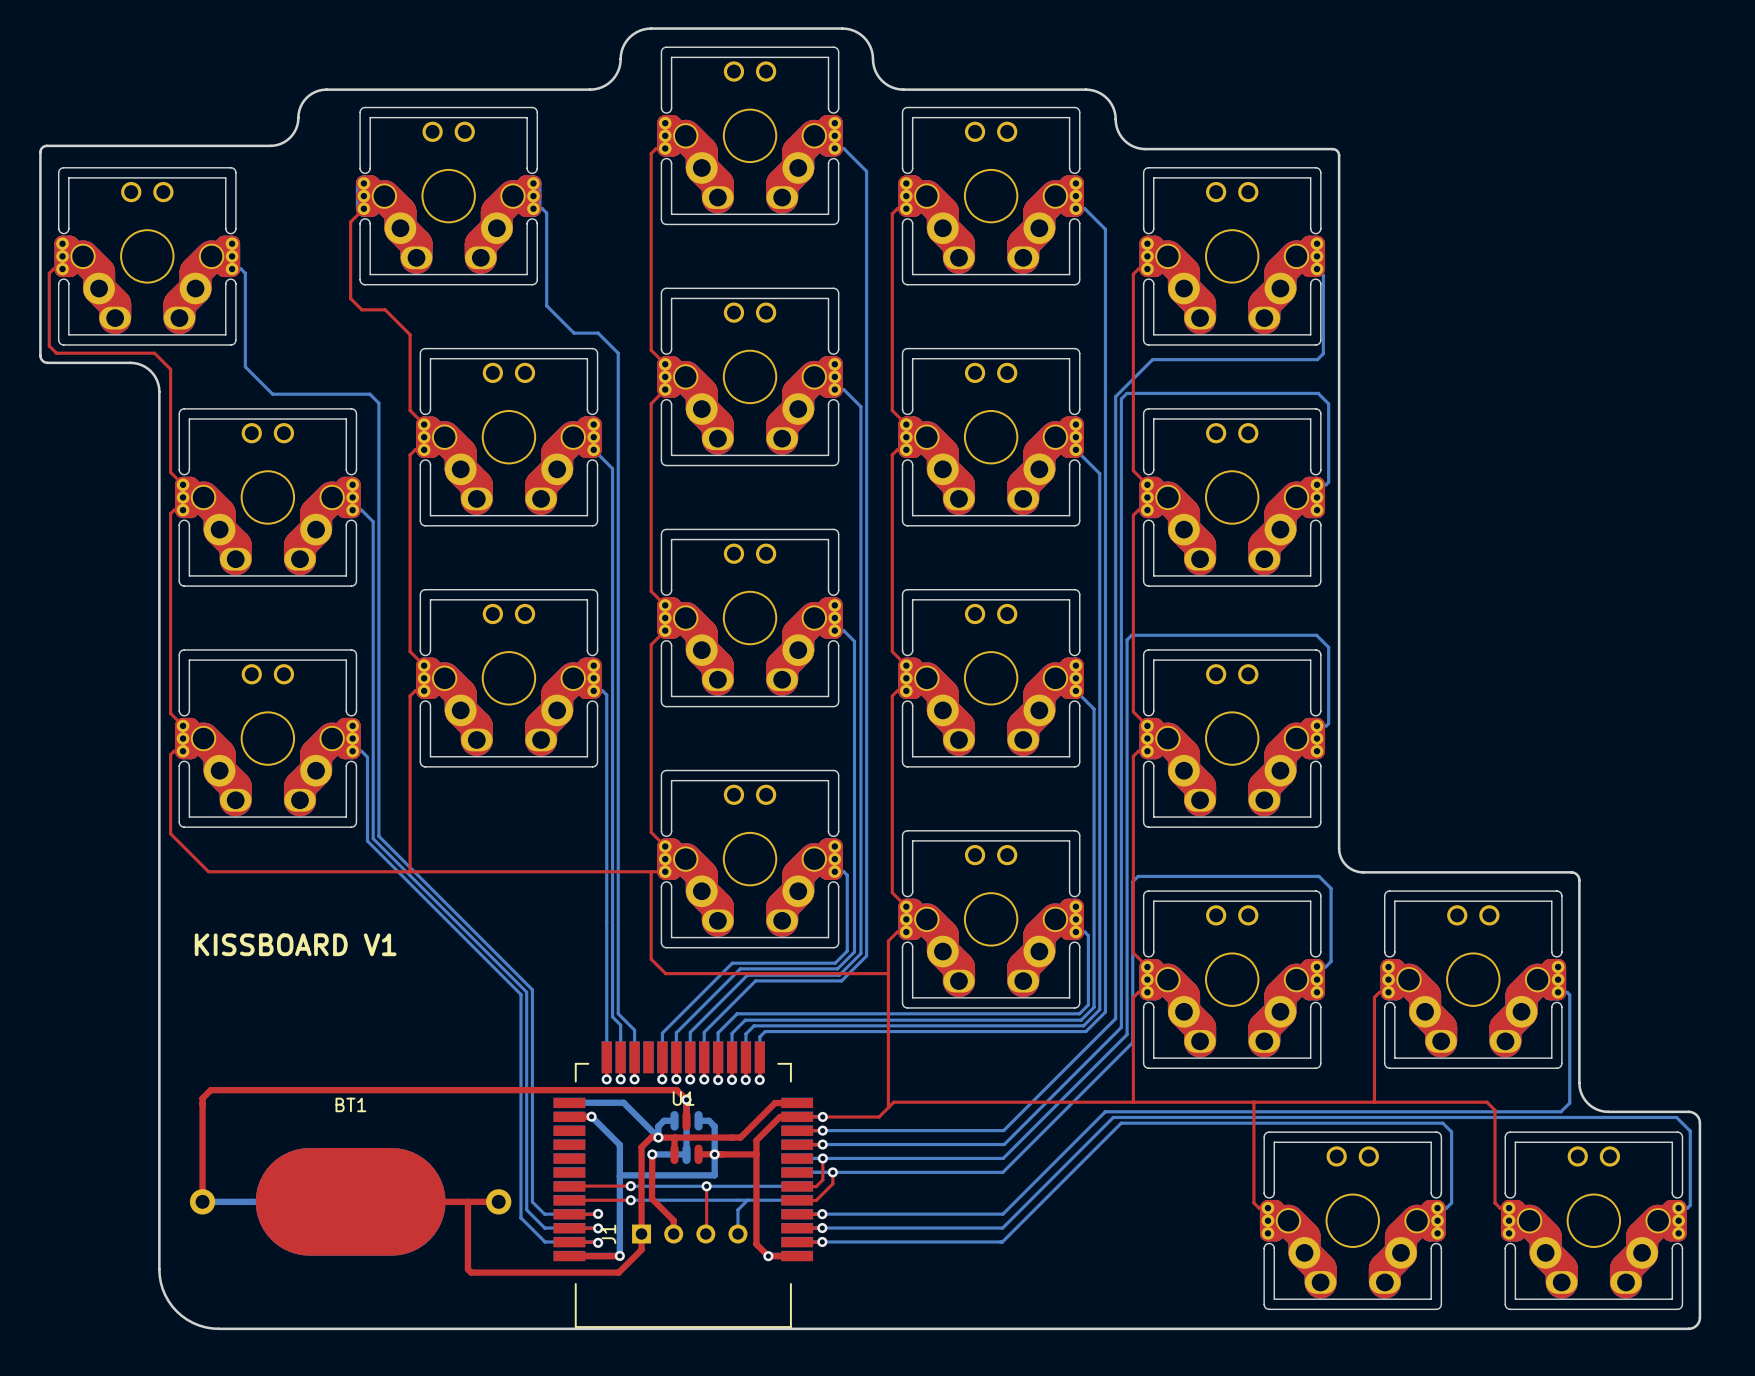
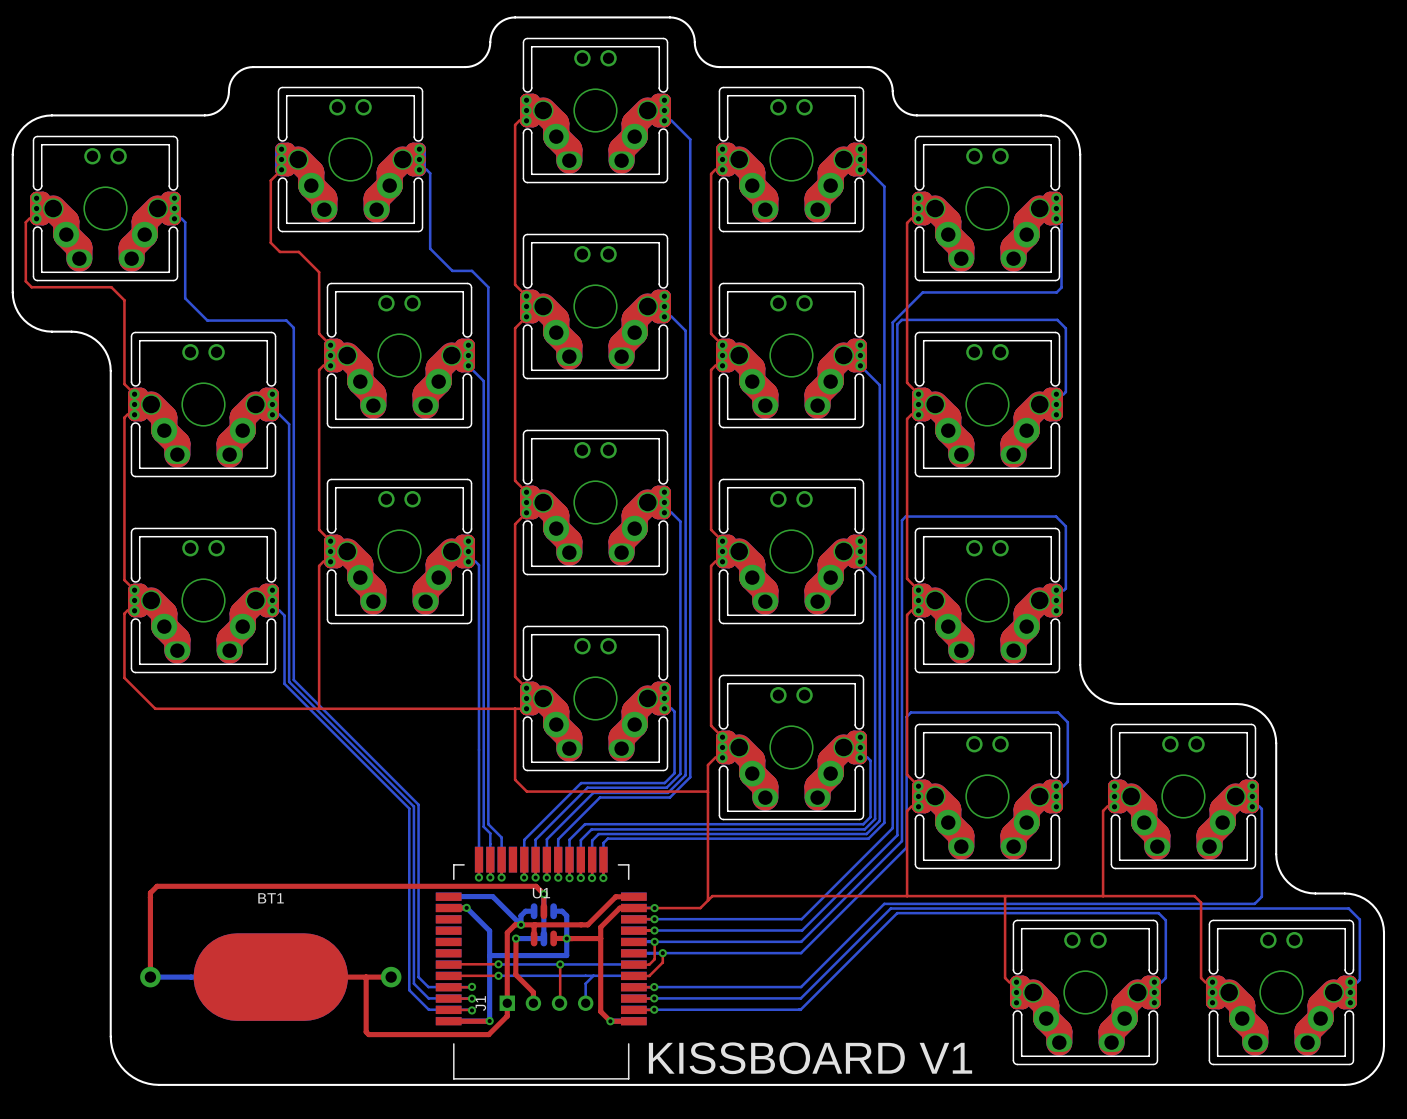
board edge: (1085, 89) (895, 88) (884, 83) (877, 74) (871, 51) (866, 40) (857, 32) (846, 28) (651, 28) (639, 30) (629, 37) (622, 47) (619, 66) (614, 77) (605, 85) (594, 89) (322, 89) (312, 93) (304, 100) (299, 110) (294, 131) (287, 140) (277, 144) (46, 145) (41, 148) (40, 358) (47, 362) (137, 363) (153, 374) (159, 388) (159, 1269) -> none
board edge: (1085, 89) (1097, 91) (1106, 98) (1113, 107) (1119, 134) (1127, 142) (1137, 148) (1332, 149) (1338, 152) (1339, 854) (1348, 867) (1360, 872) (1571, 872) (1577, 875) (1579, 880) (1579, 1082) (1583, 1097) (1593, 1107) (1604, 1111) (1690, 1111) (1695, 1114) (1699, 1120) (1699, 1317) (1697, 1324) (1688, 1328) (218, 1328) (199, 1325) (176, 1311) (165, 1295) (159, 1269) -> none
board edge: none -> (1080, 154) (1081, 674) (1088, 688) (1095, 695) (1114, 703) (1237, 704) (1252, 707) (1268, 719) (1274, 733) (1276, 743)
board edge: none -> (1080, 154) (1078, 144) (1072, 130) (1060, 120) (1051, 116) (916, 115) (907, 113) (895, 103) (891, 84) (887, 76) (874, 67) (713, 66) (704, 61) (698, 54) (692, 32) (687, 24) (679, 19) (669, 17) (511, 17) (502, 20) (495, 27) (491, 35) (486, 54) (480, 61) (471, 66) (249, 67) (241, 70) (233, 76) (229, 84) (225, 103) (219, 110) (211, 114) (46, 115) (36, 118) (24, 126) (15, 139) (12, 154) (12, 292) (15, 307) (24, 320) (36, 328) (46, 331) (76, 331) (91, 336) (105, 351) (110, 365) (110, 1036) (113, 1052) (118, 1062) (128, 1074) (143, 1082) (159, 1084) (1349, 1084) (1368, 1076) (1375, 1069) (1382, 1055) (1383, 927) (1375, 908) (1364, 898) (1349, 893) (1315, 893)
board edge: none -> (1276, 743) (1277, 864) (1281, 873) (1291, 885) (1300, 890) (1315, 893)
text: KISSBOARD V1 (295, 944) -> none
text: none -> KISSBOARD V1 (810, 1058)

